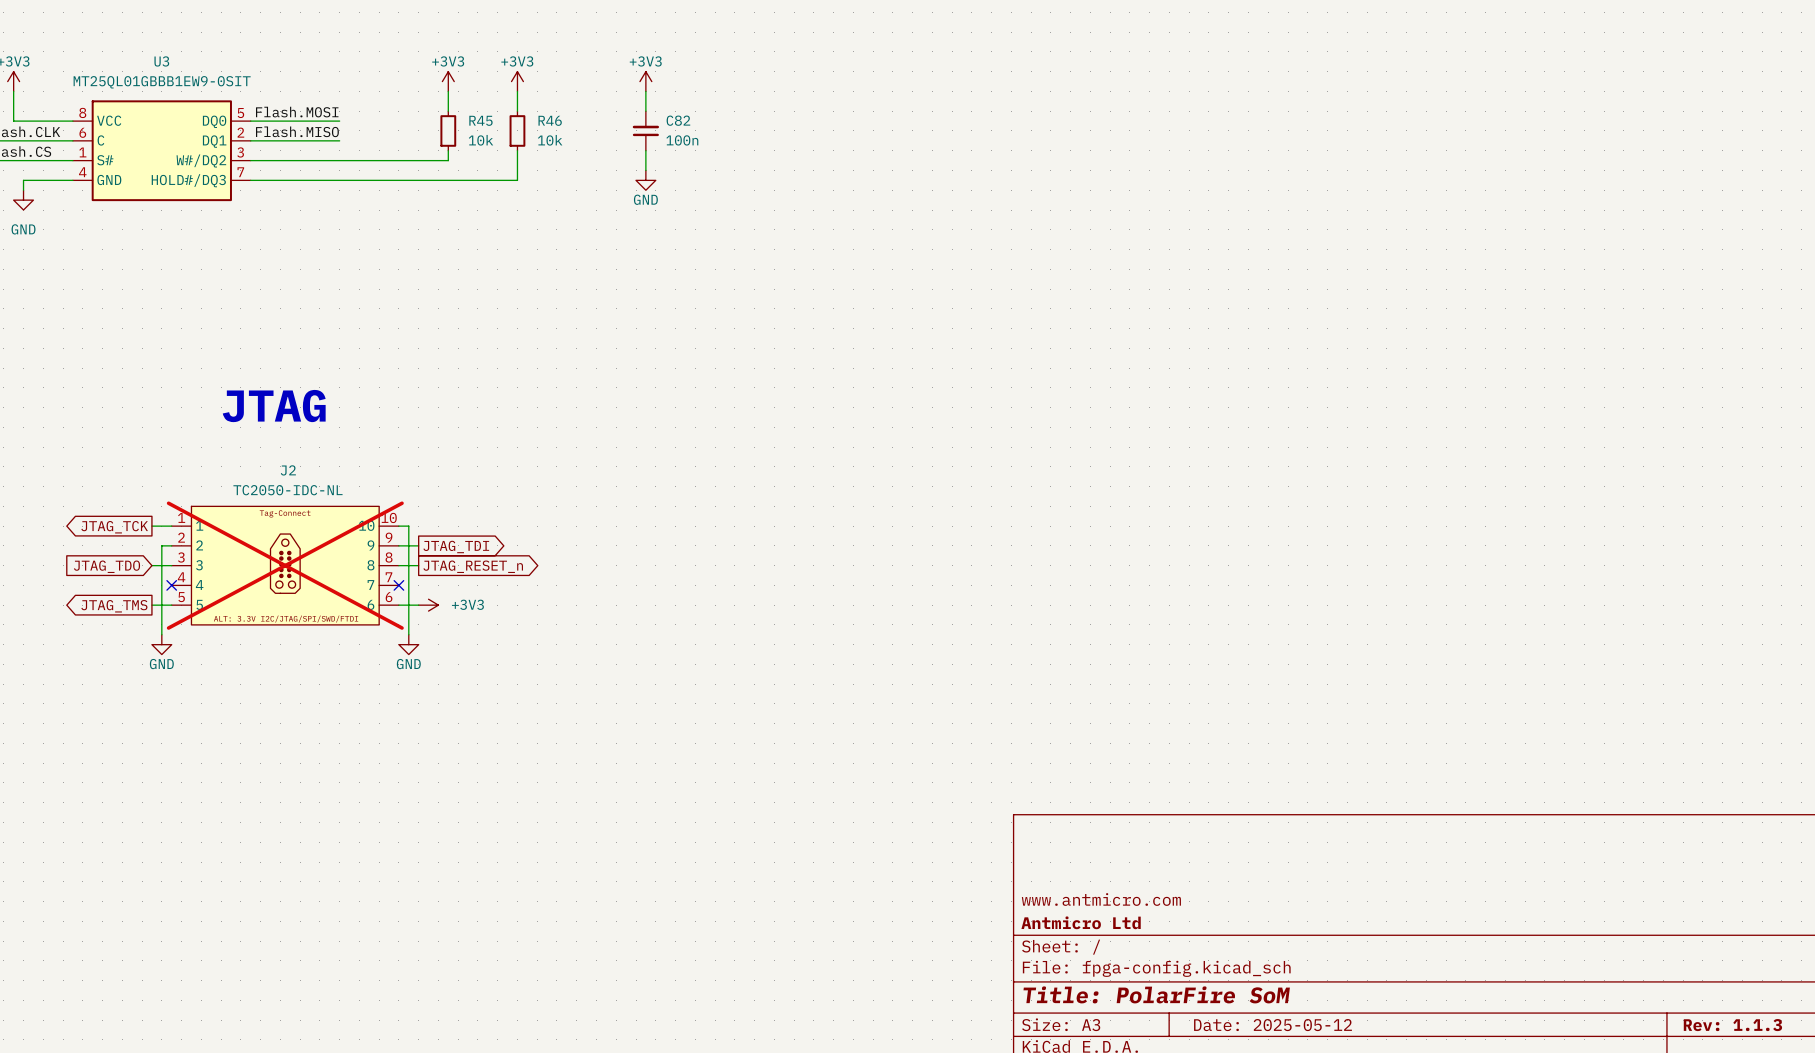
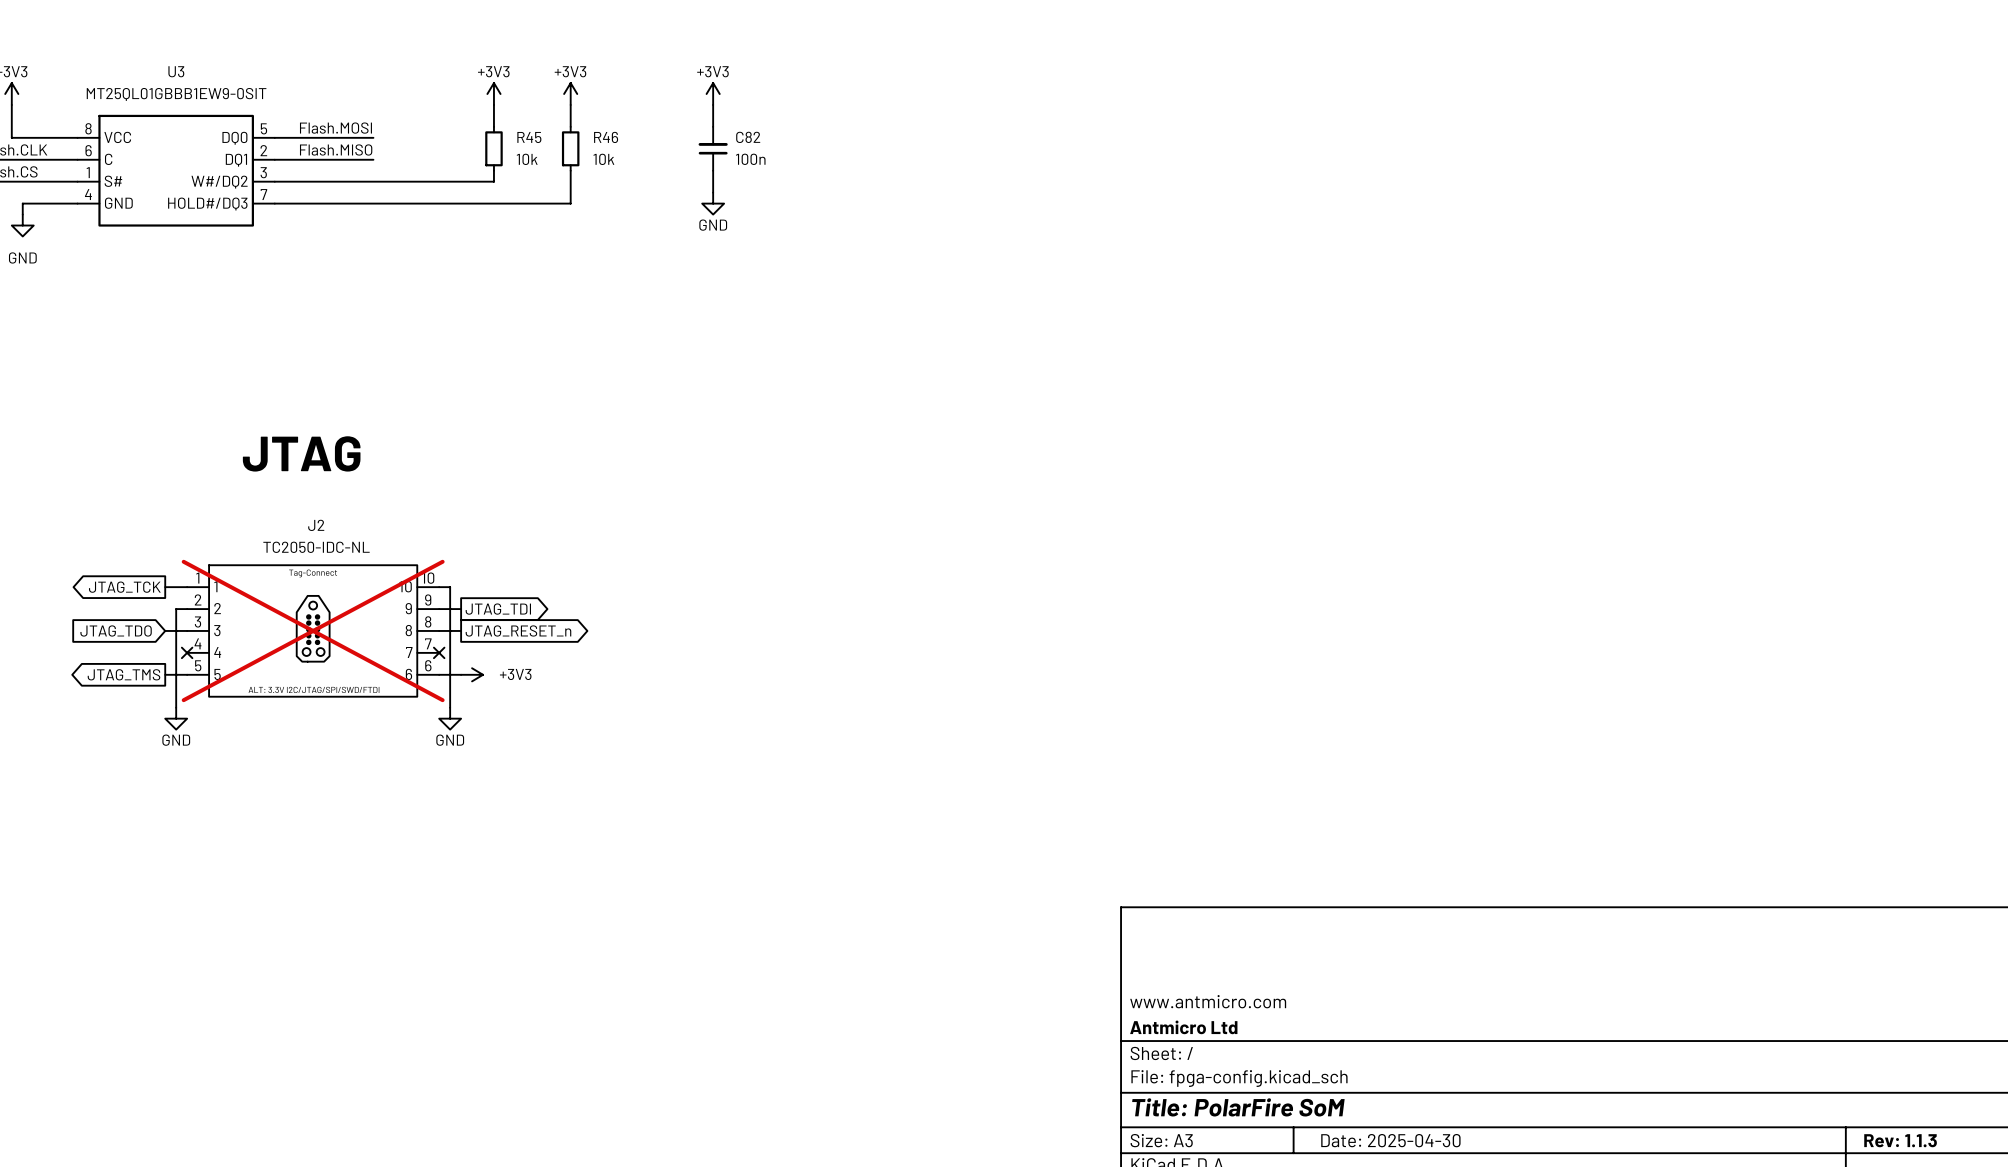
title block: Date: 2025-05-12 (1272, 1025) -> Date: 2025-04-30 (1390, 1140)

